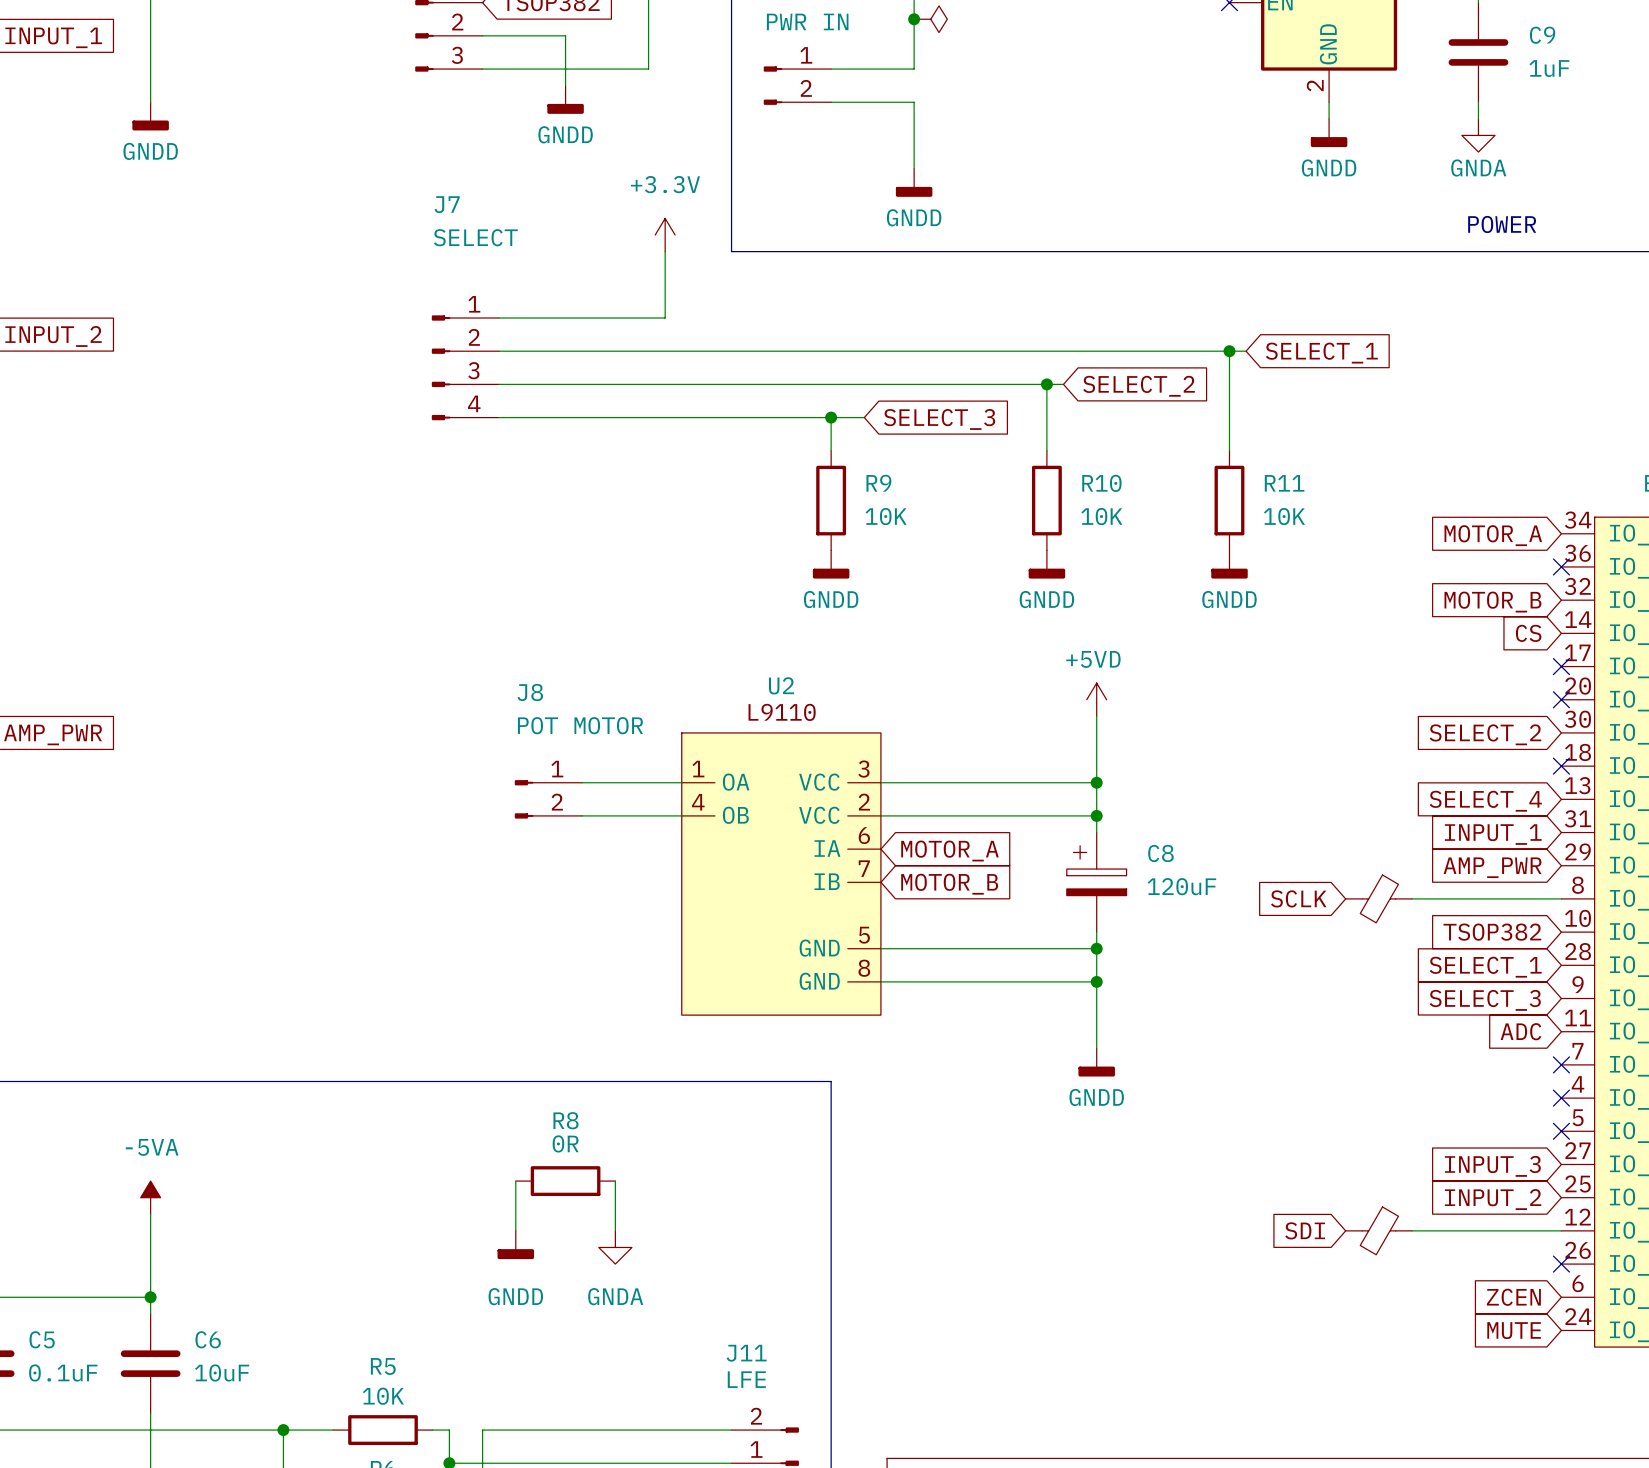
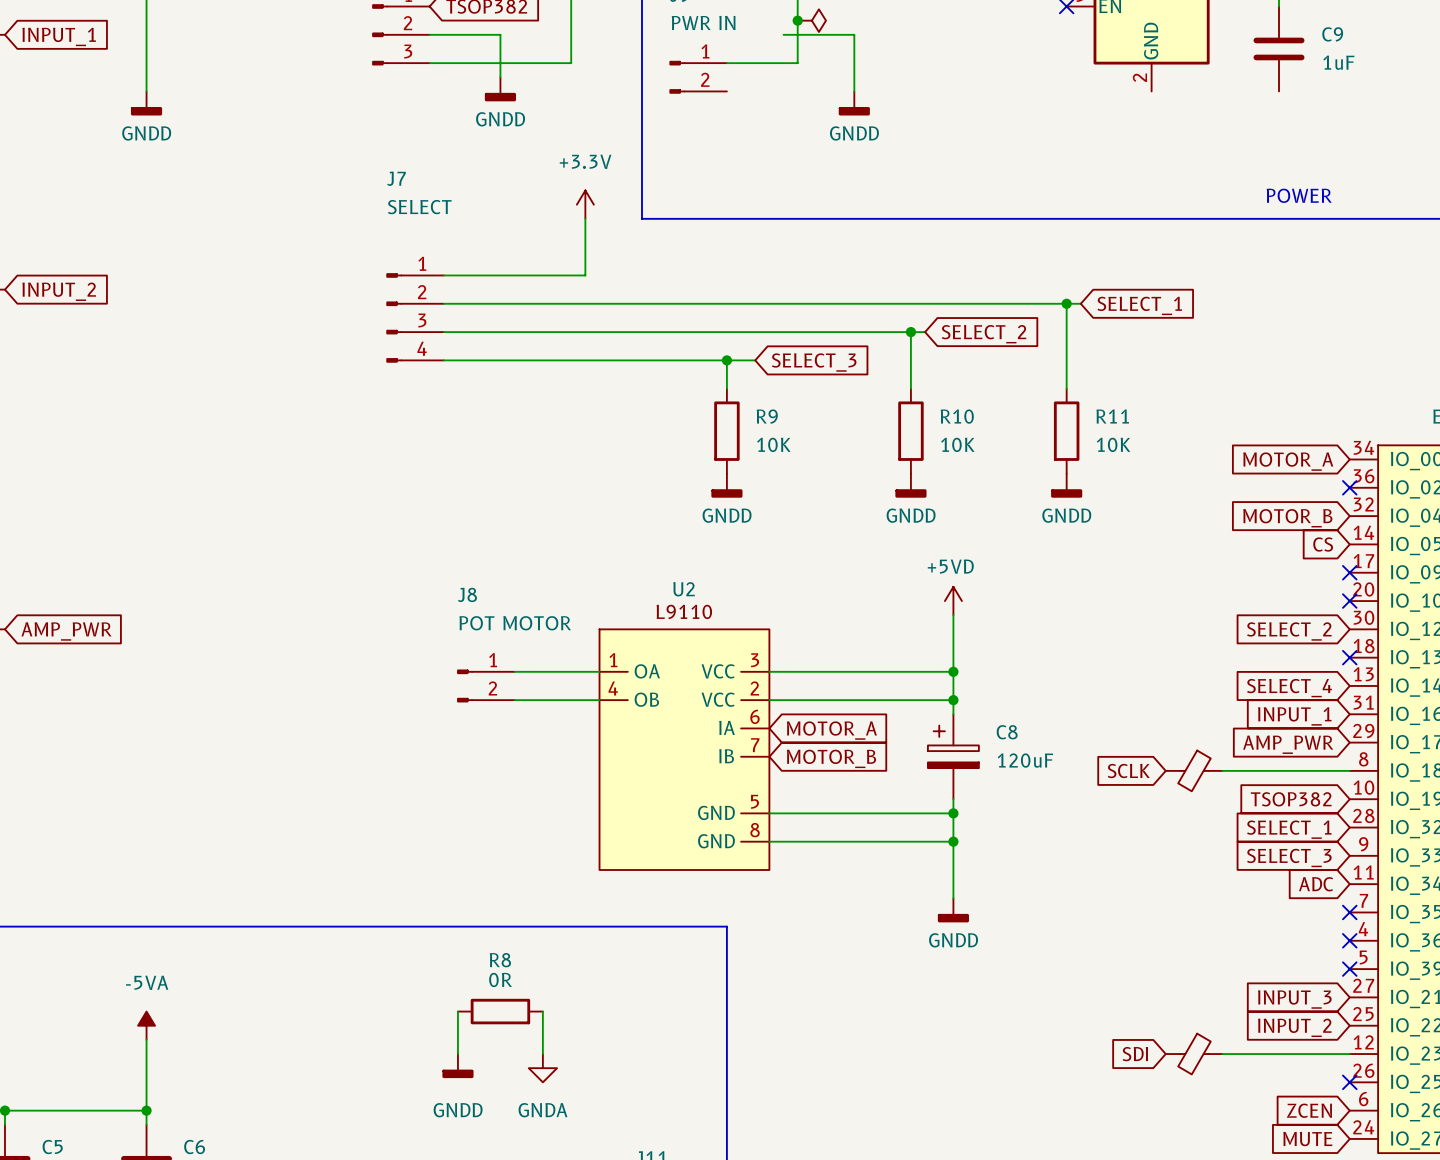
wire: (831, 102) (914, 102) (914, 168) -> (783, 34) (854, 34) (854, 91)
wire: (1329, 102) (1329, 118) -> none
wire: (1478, 102) (1478, 118) -> none
power symbol: GNDD (1329, 132) -> none
power symbol: GNDA (1478, 135) -> none
power symbol position: GNDD (914, 182) -> GNDD (854, 103)

